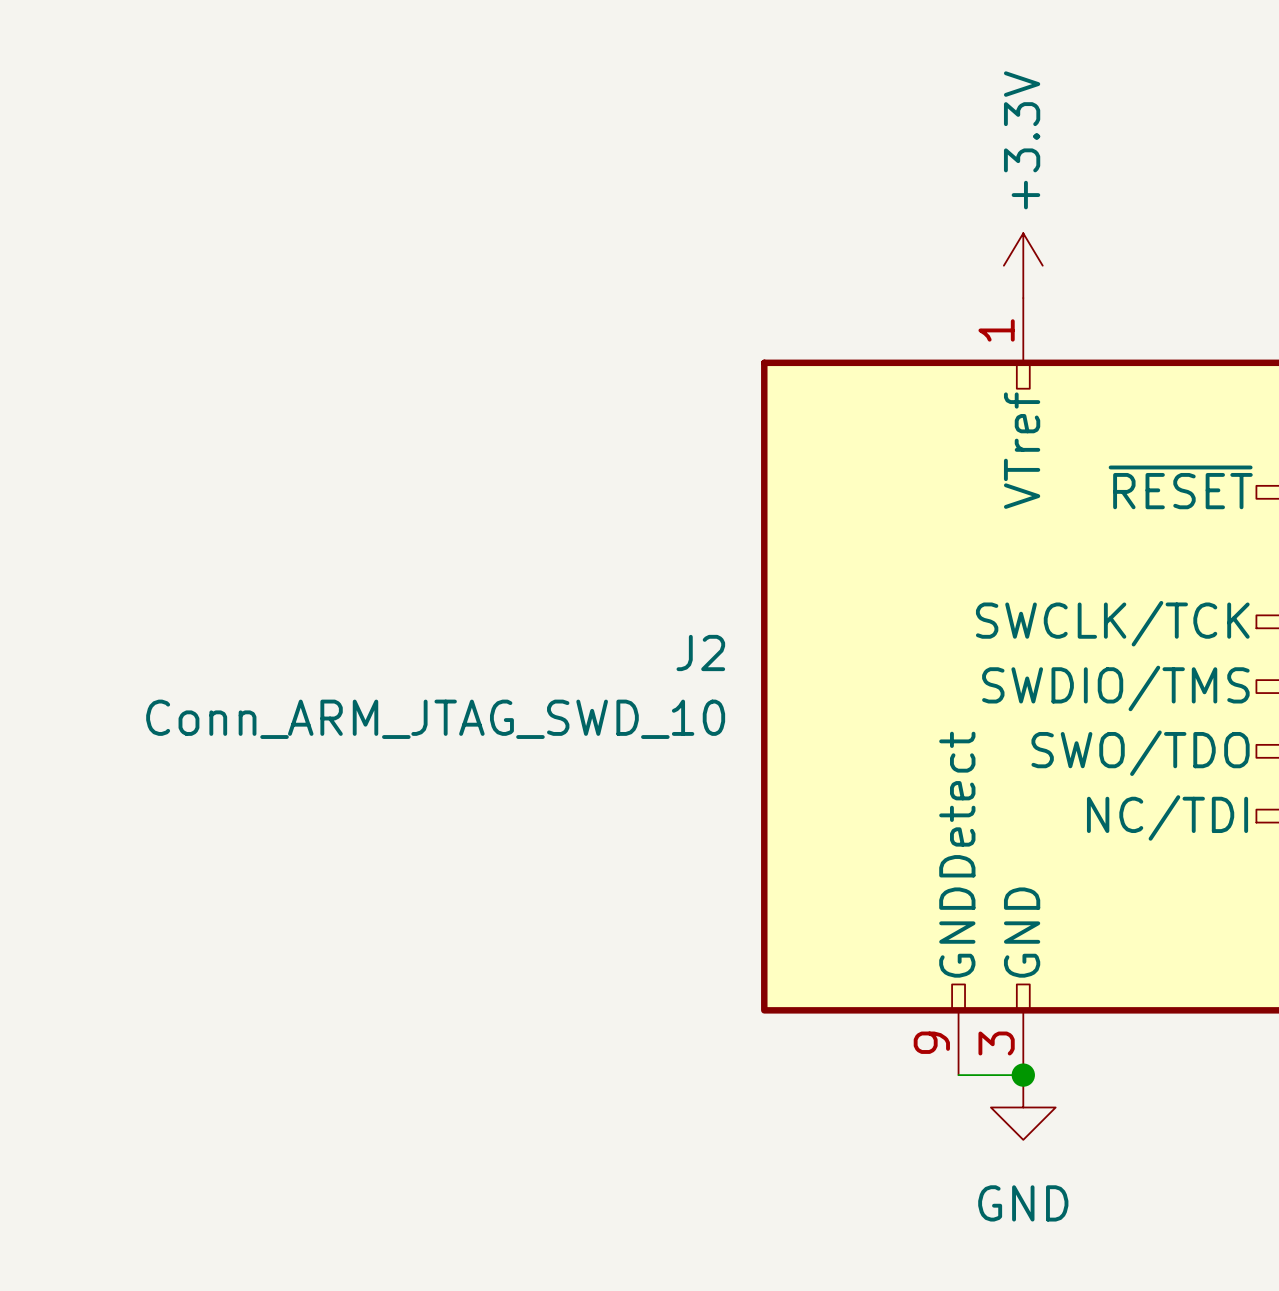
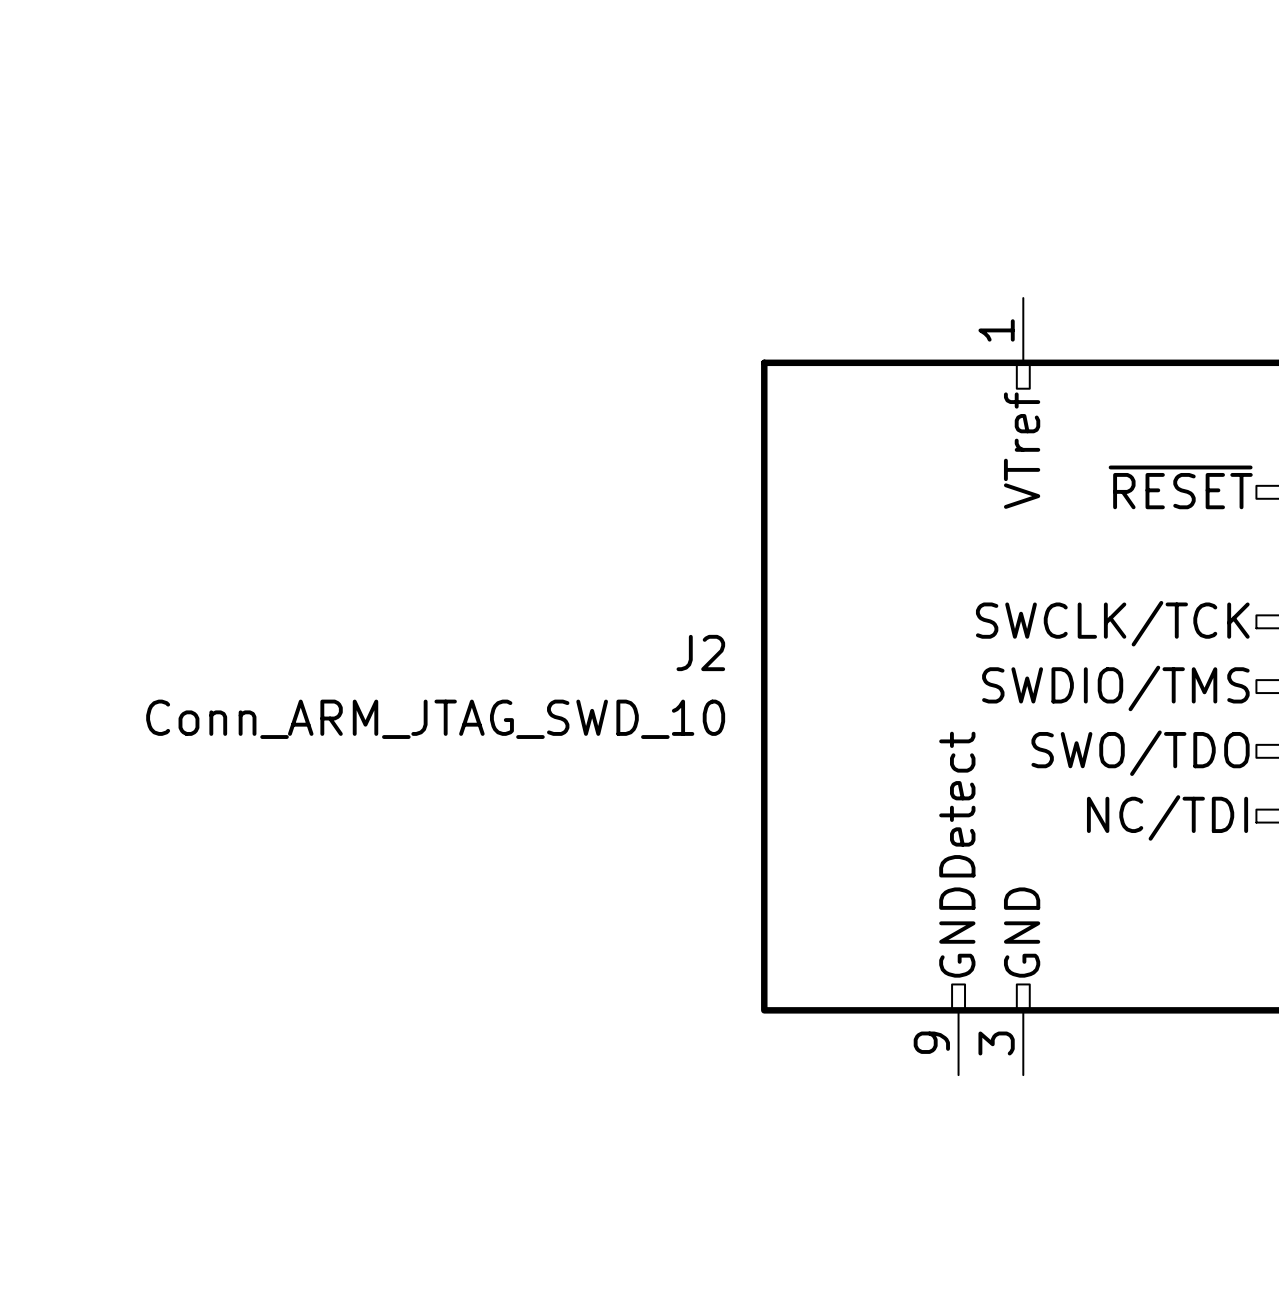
power symbol: +3.3V (1023, 265) -> none
wire: (958, 1075) (1023, 1075) -> none
junction: (1023, 1075) -> none
power symbol: GND (1023, 1107) -> none

